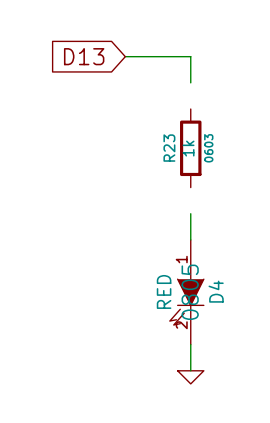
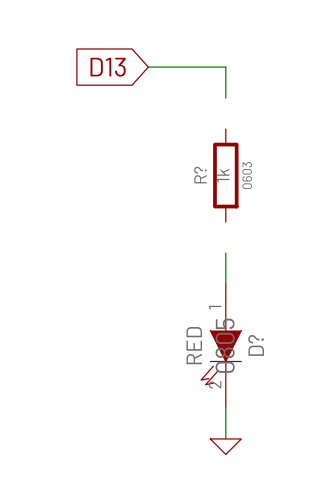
R23 name: R23 (169, 148) -> R? (200, 175)
D4 name: D4 (216, 291) -> D? (256, 345)

